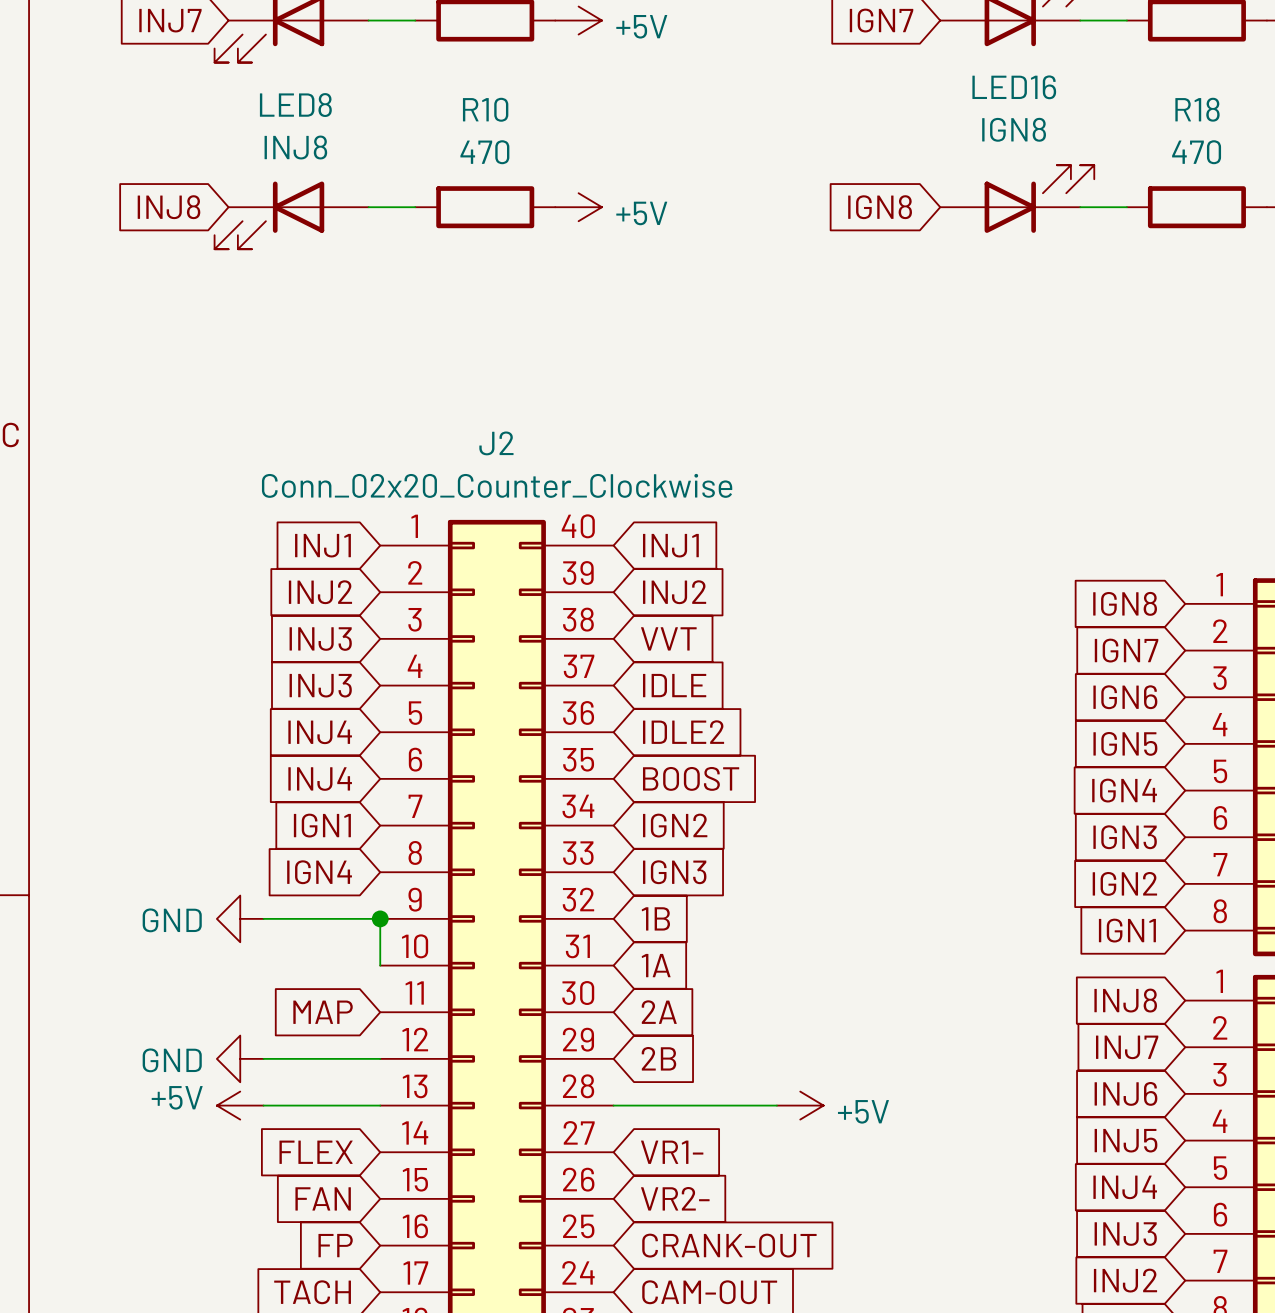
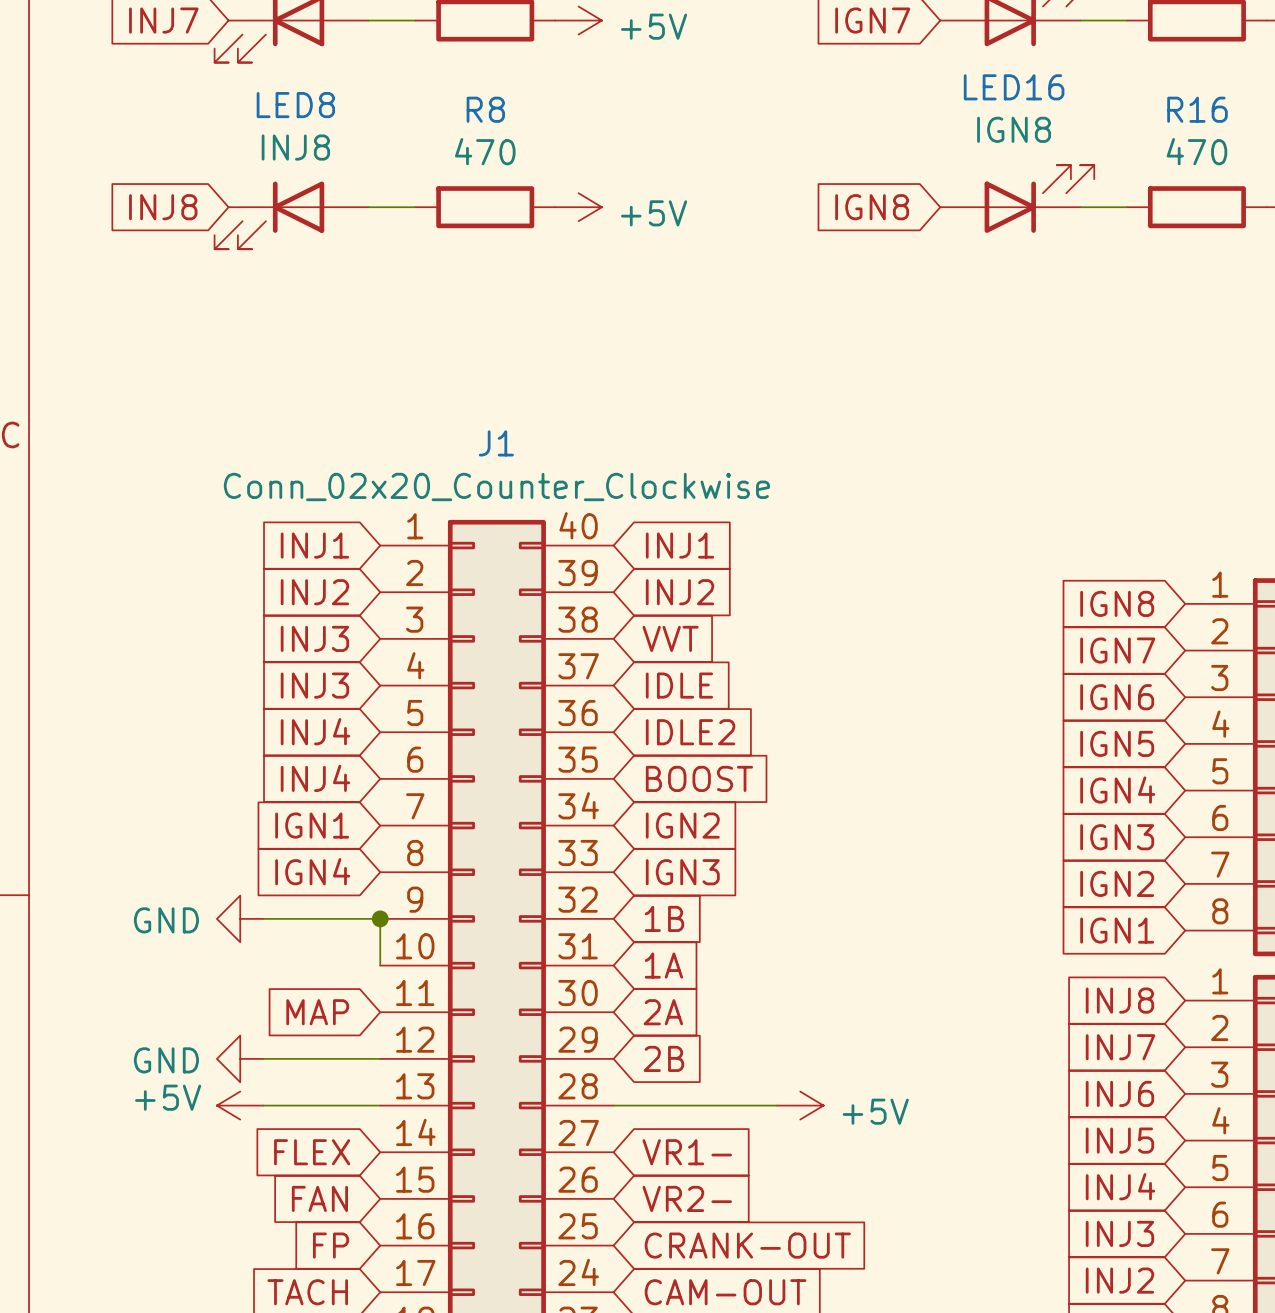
R10 name: R10 (485, 109) -> R8 (485, 109)
R18 name: R18 (1197, 109) -> R16 (1197, 109)
J2 name: J2 (496, 443) -> J1 (496, 443)

